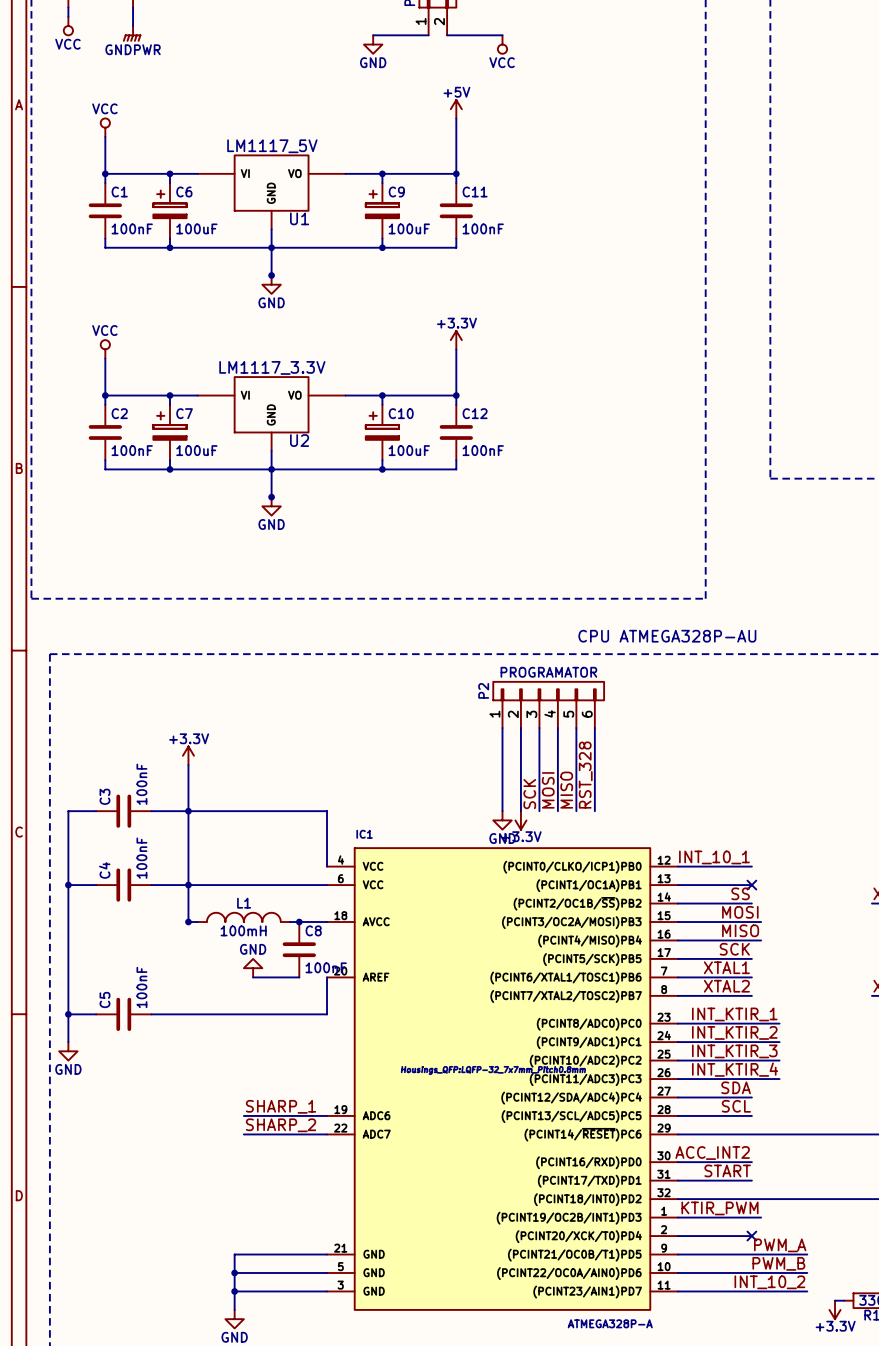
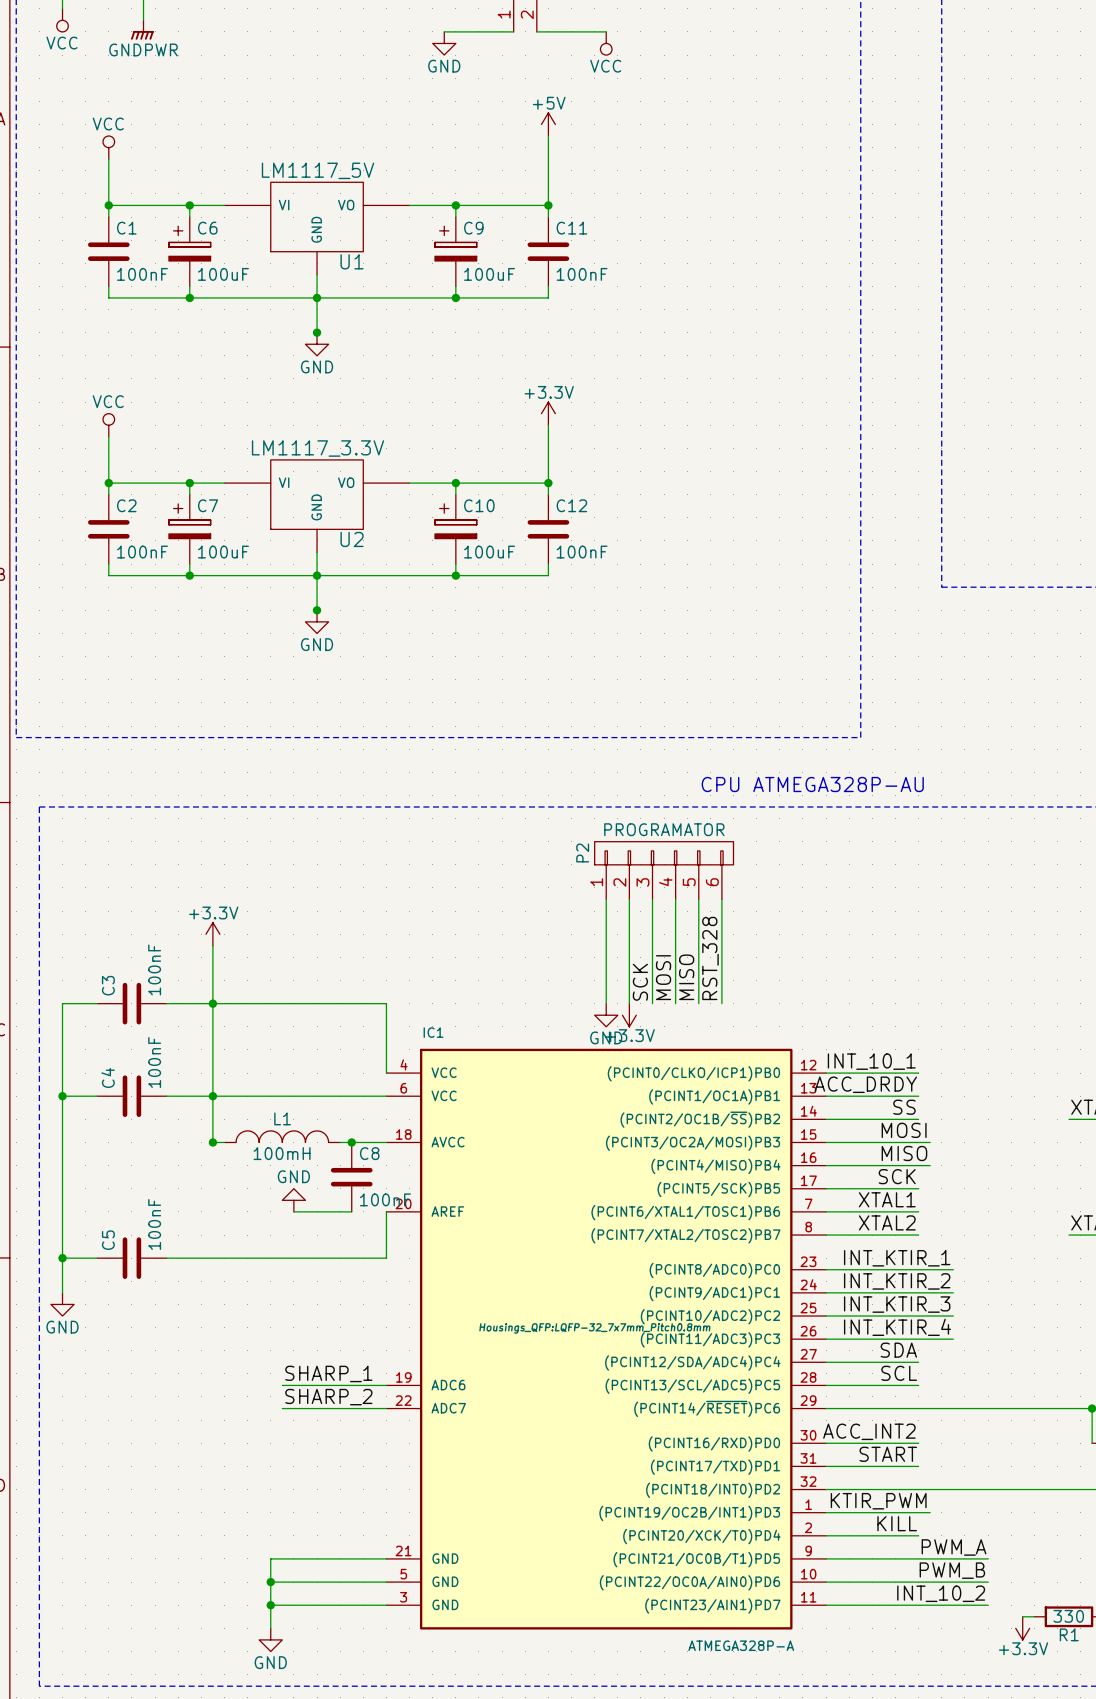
label: none -> ACC_DRDY (865, 1084)
no-connect mark: (751, 885) -> none
label: none -> KILL (897, 1523)
no-connect mark: (751, 1236) -> none

